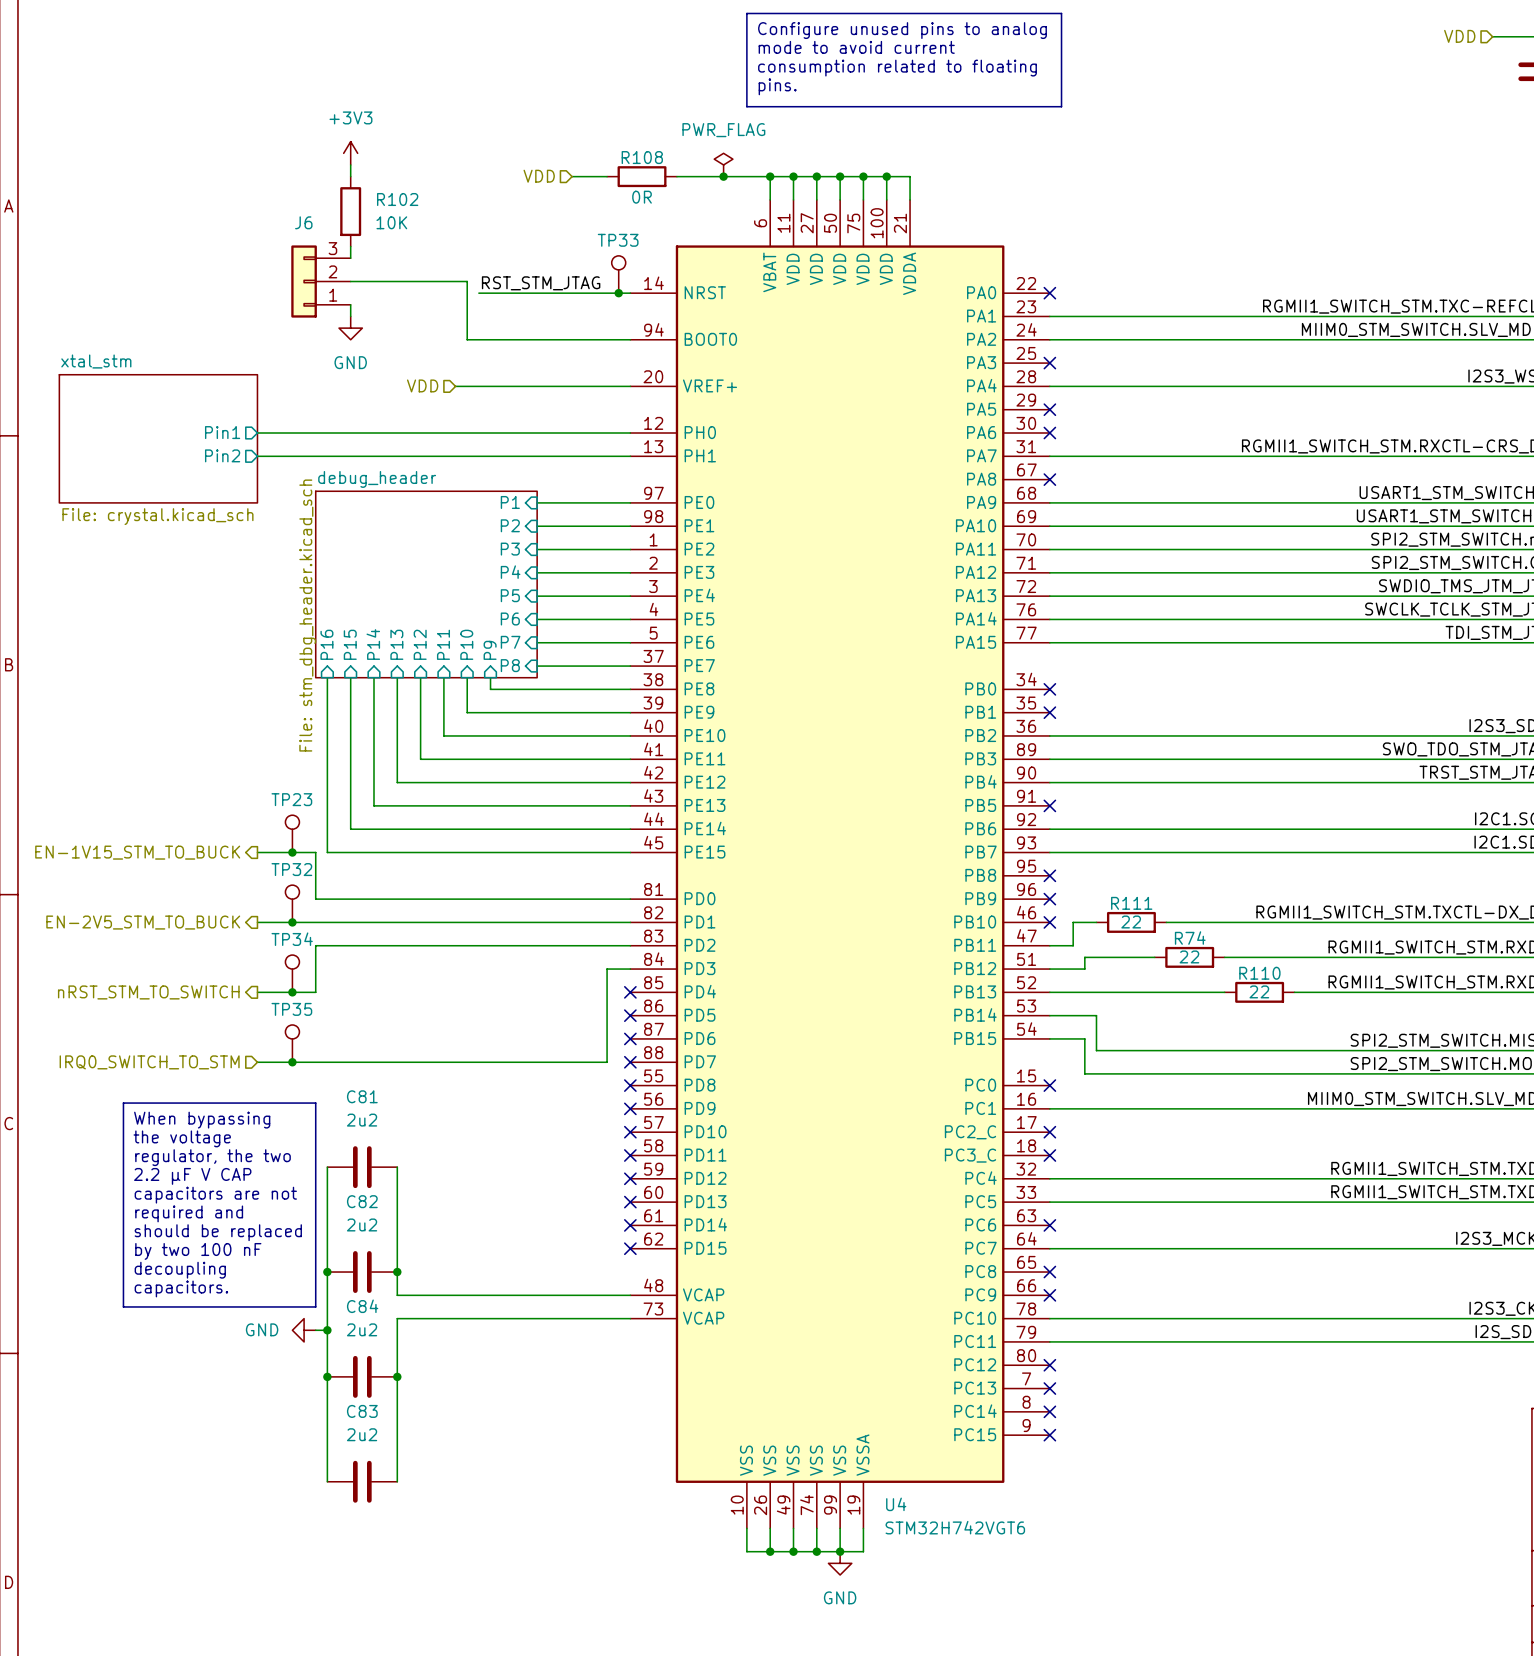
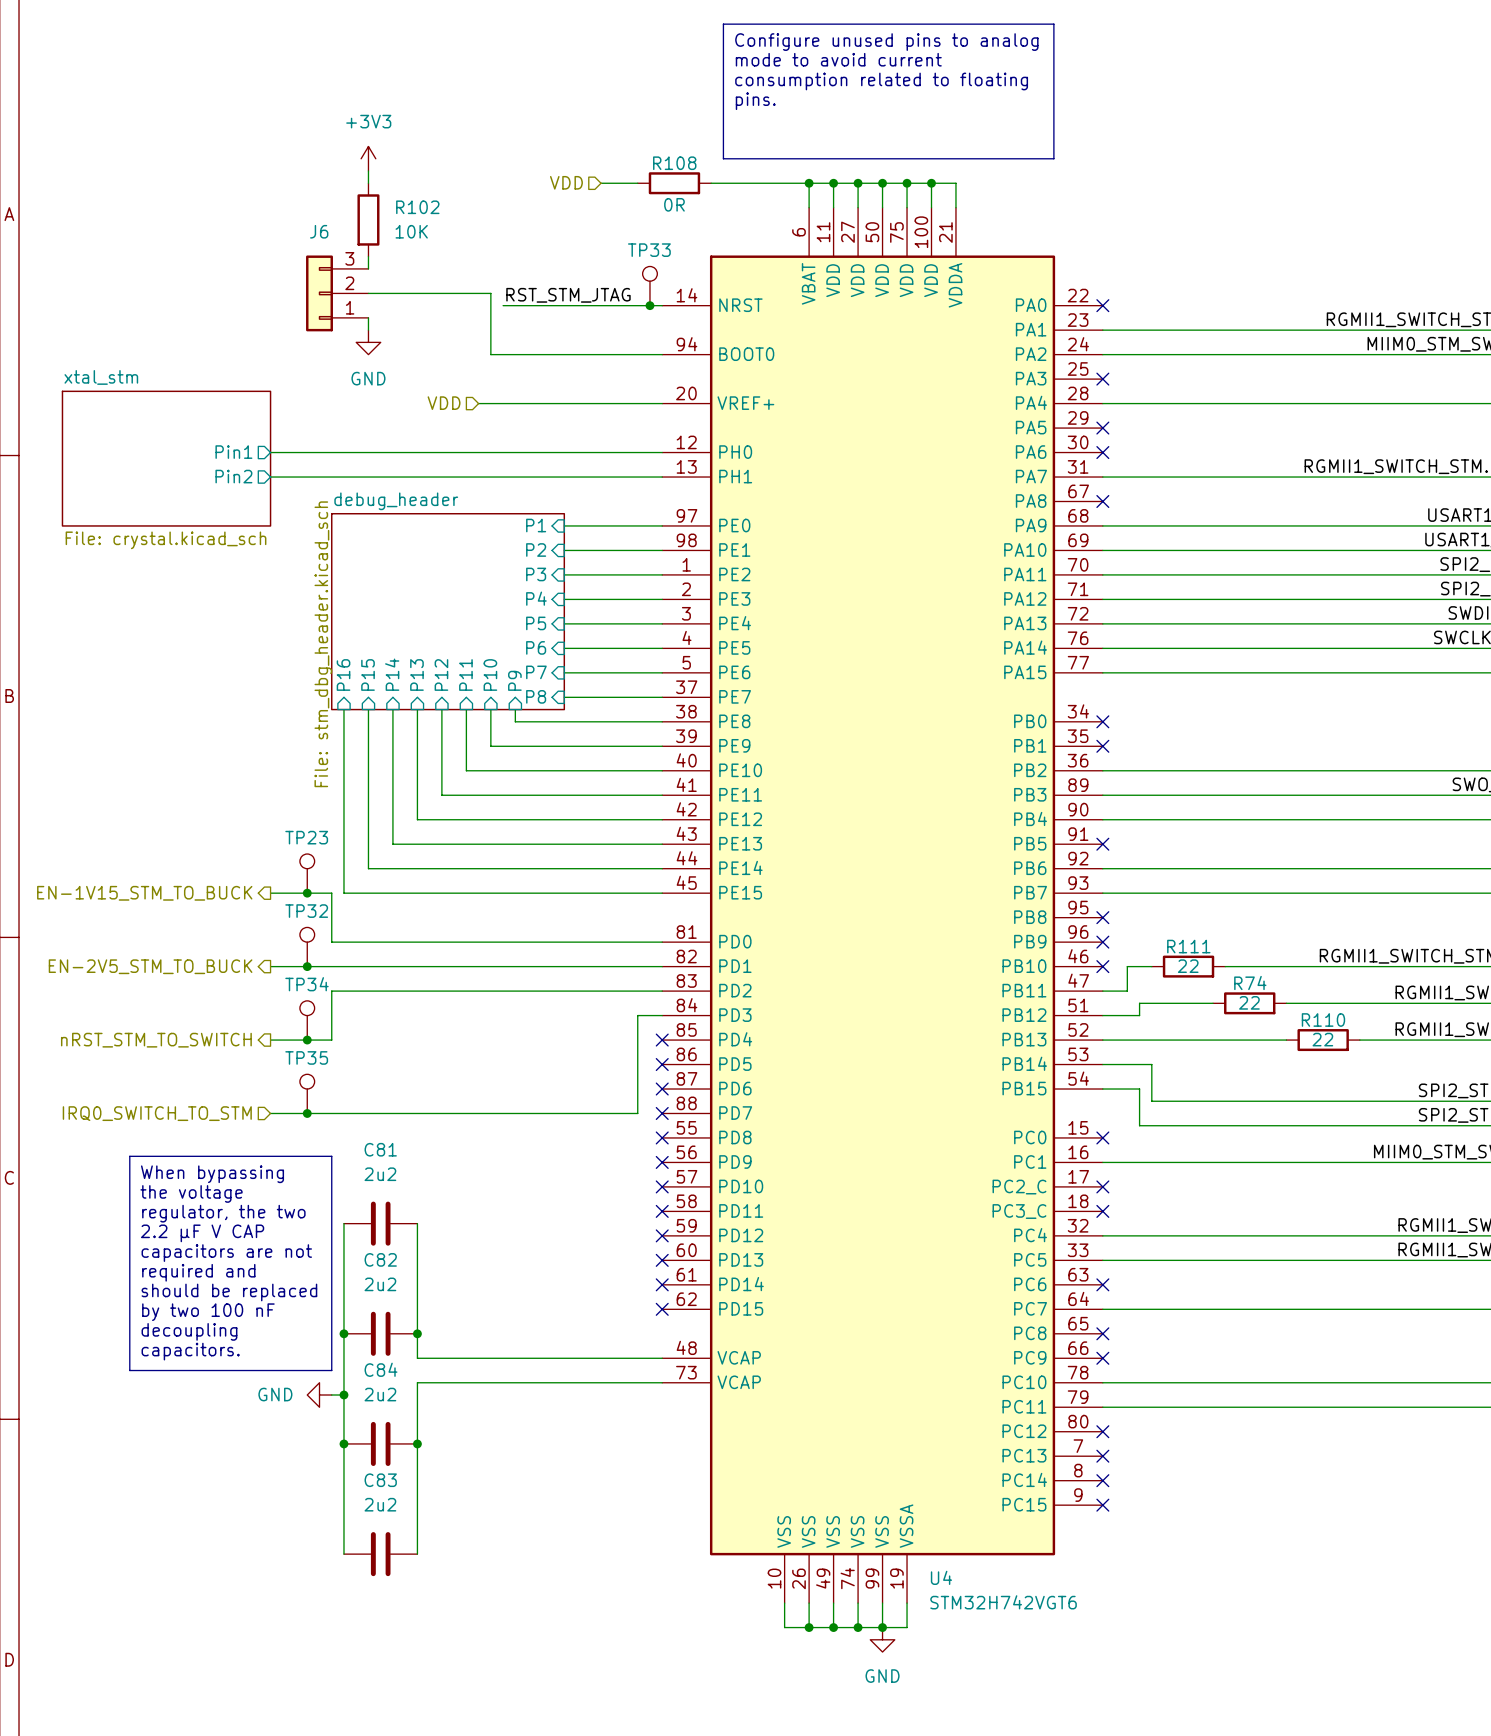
line: (746, 13) (1061, 13) (1061, 106) (746, 106) (746, 13) -> none
line: none -> (723, 24) (1053, 24) (1053, 158) (723, 158) (723, 24)
text position: Configure unused pins to analog (902, 30) -> Configure unused pins to analog (886, 42)
text position: mode to avoid current (856, 47) -> mode to avoid current (838, 59)
text position: consumption related to floating (897, 68) -> consumption related to floating (881, 81)
text position: pins. (777, 86) -> pins. (755, 101)
power symbol: PWR_FLAG (723, 164) -> none
junction: (723, 176) -> none

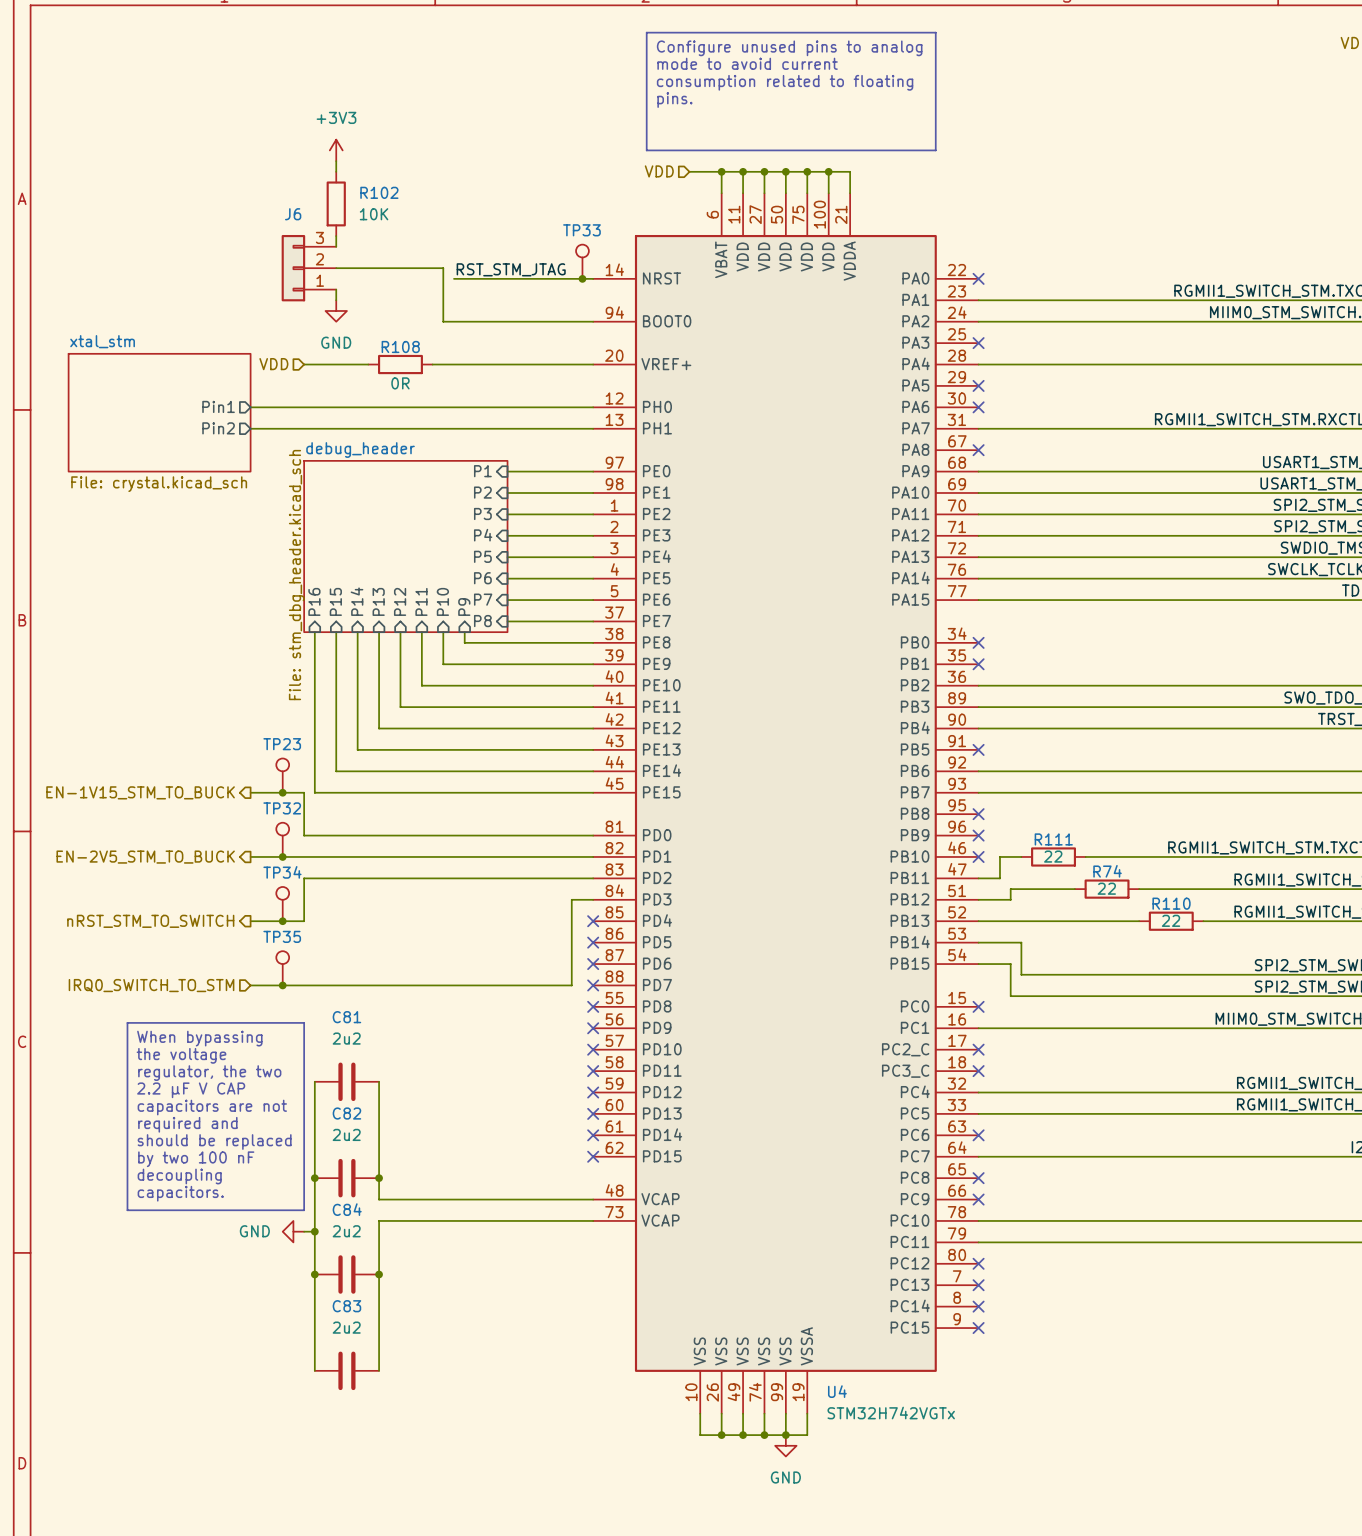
hierarchical label position: VDD (566, 182) -> VDD (659, 171)
wire: (601, 183) (637, 183) -> none
R108 position: (674, 183) -> (400, 364)
wire: (711, 183) (772, 183) -> none
wire: none -> (304, 364) (368, 364)
hierarchical label position: VDD (444, 403) -> VDD (273, 364)
U4 value: STM32H742VGT6 (1003, 1602) -> STM32H742VGTx (891, 1413)

